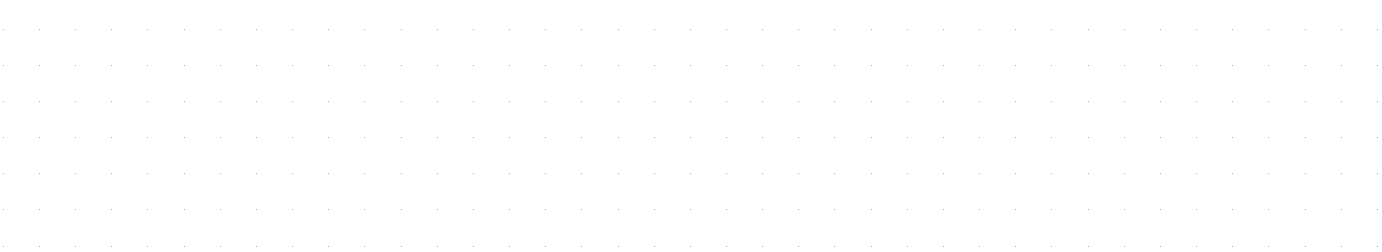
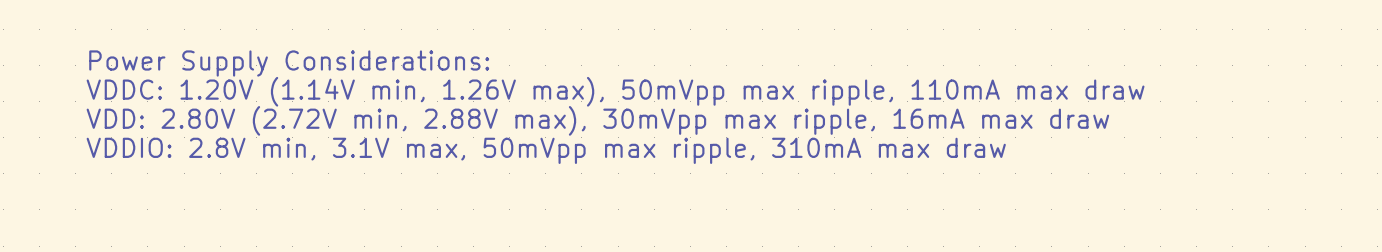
text: none -> Power Supply Considerations: (289, 63)
text: none -> VDDC: 1.20V (1.14V min, 1.26V max), 50mVpp max ripple, 110mA max draw (615, 91)
text: none -> VDD: 2.80V (2.72V min, 2.88V max), 30mVpp max ripple, 16mA max draw (597, 120)
text: none -> VDDIO: 2.8V min, 3.1V max, 50mVpp max ripple, 310mA max draw (546, 150)

